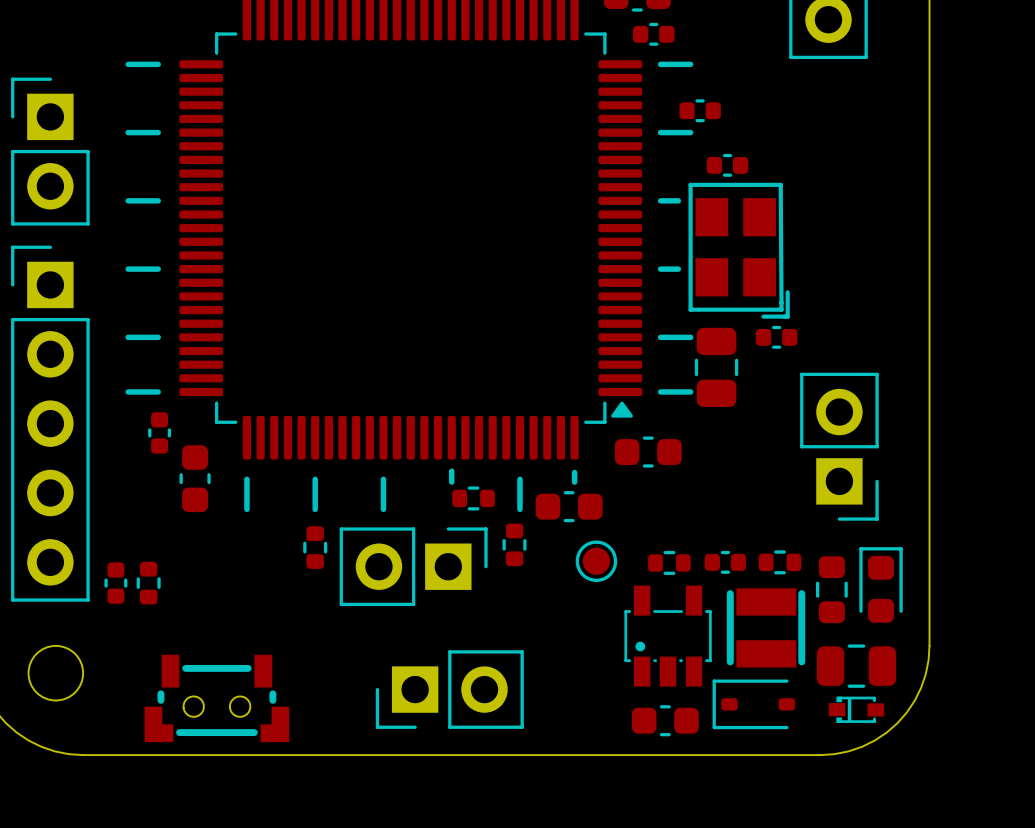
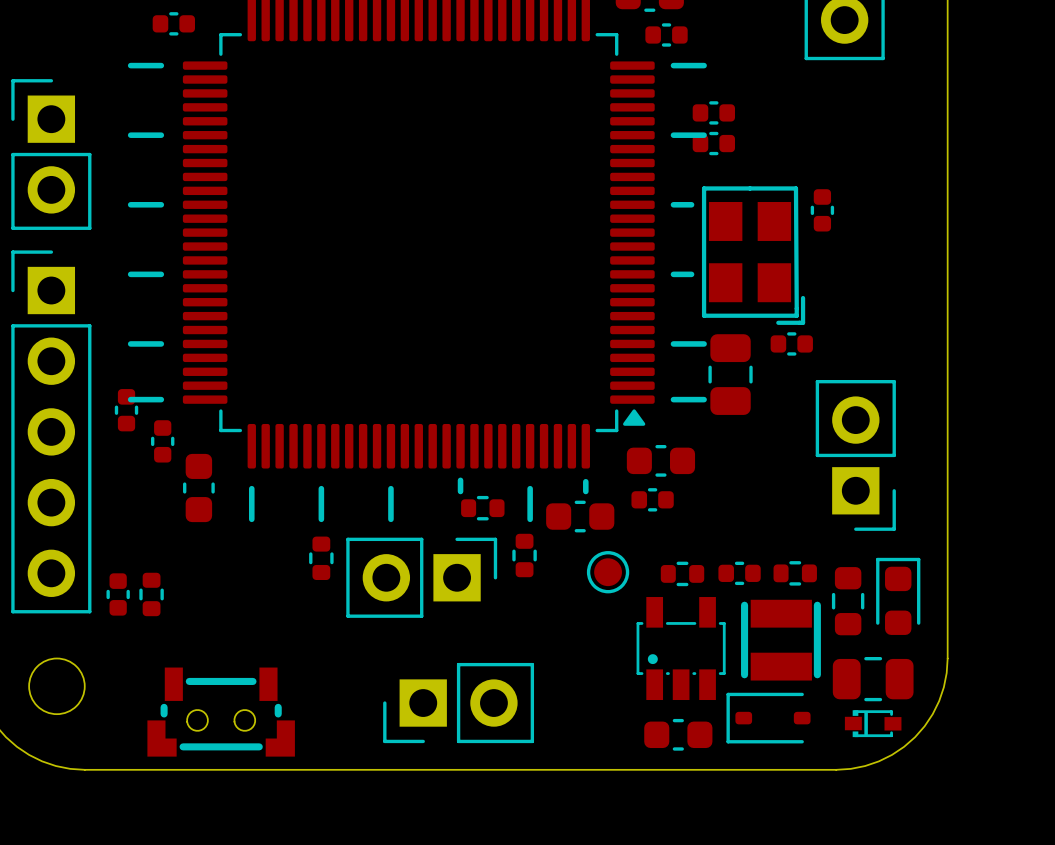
part: none -> (173, 23)
part position: (727, 165) -> (713, 143)
part: none -> (822, 210)
part: none -> (126, 410)
part: none -> (652, 499)

